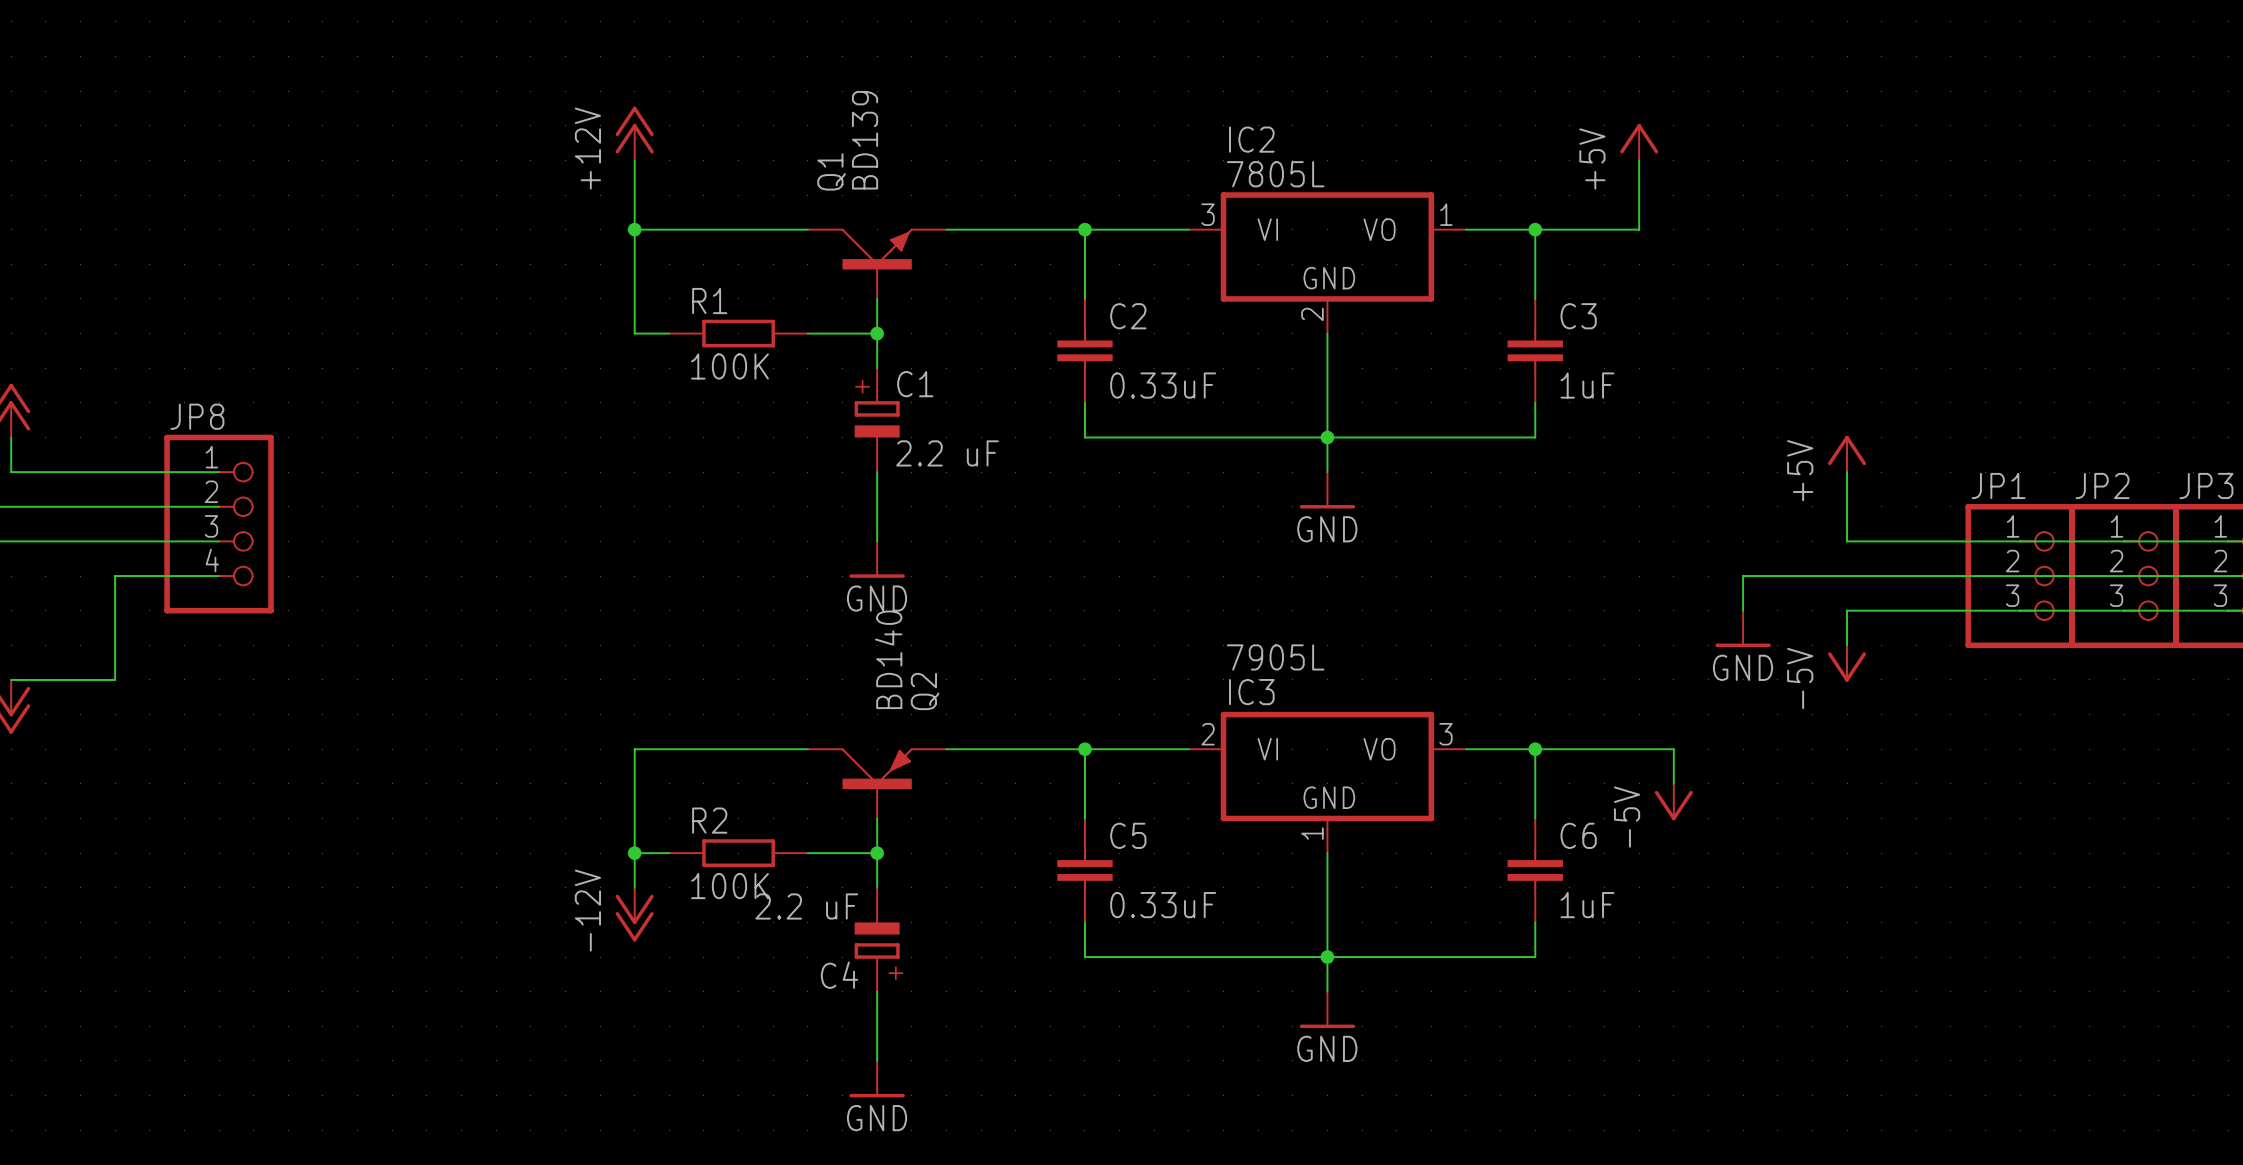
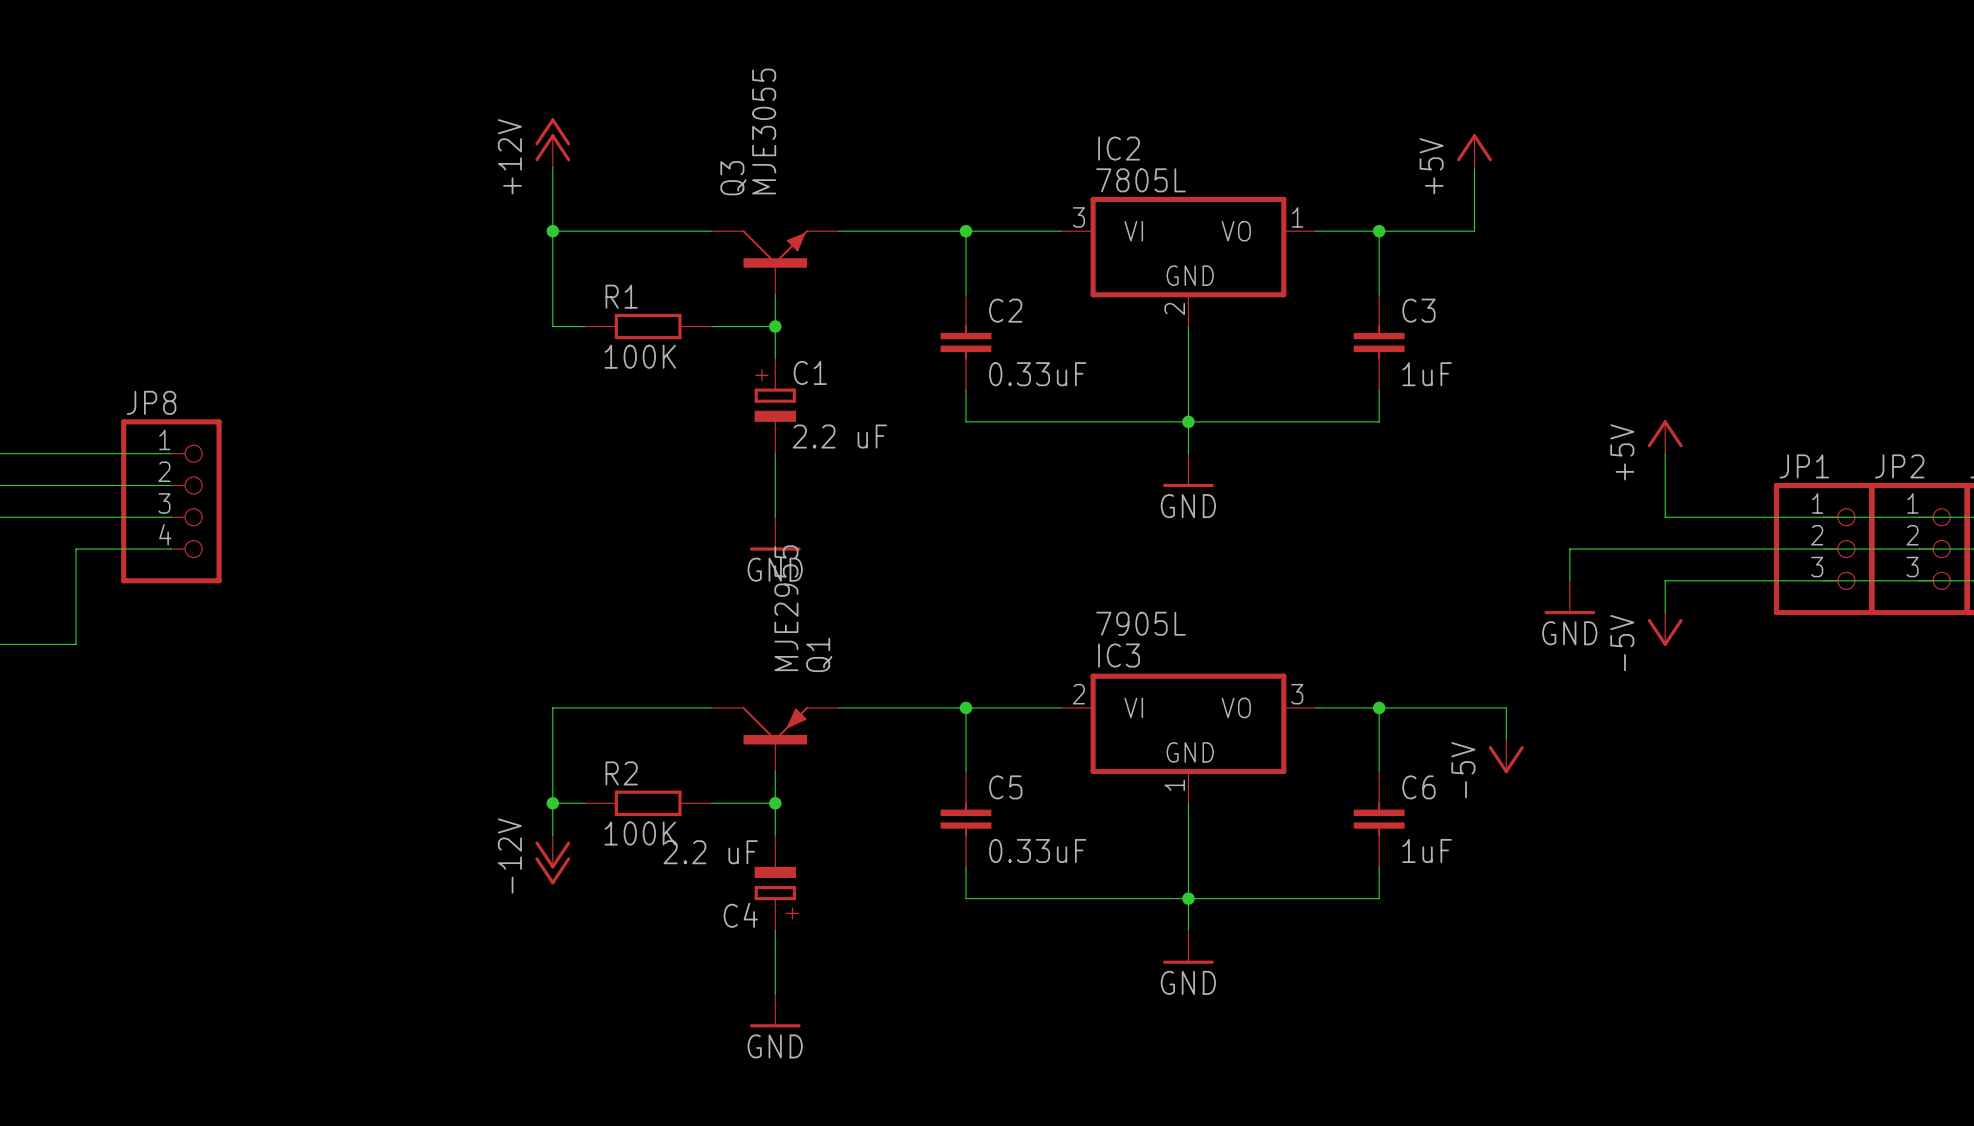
Q1 value: BD139 (865, 140) -> MJE3055 (764, 131)
Q1 name: Q1 (831, 171) -> Q3 (733, 178)
Q2 value: BD140 (888, 659) -> MJE2955 (786, 608)
Q2 name: Q2 (925, 691) -> Q1 (819, 654)

